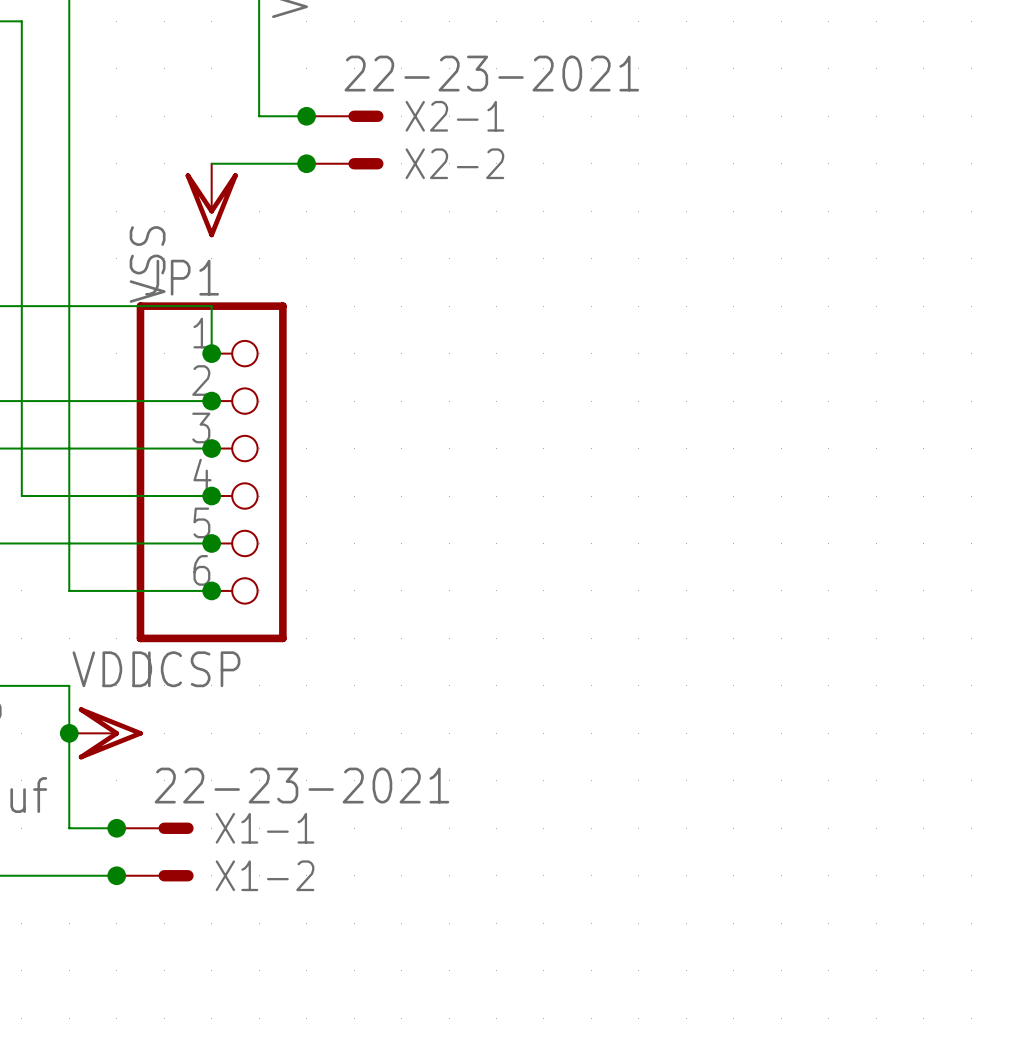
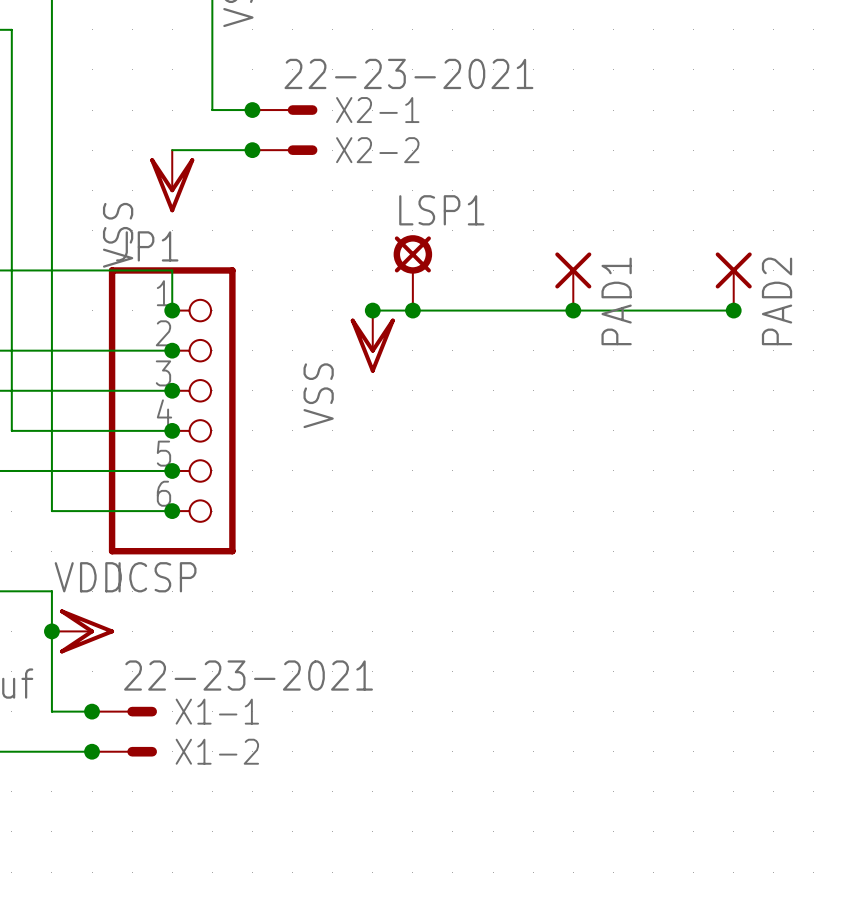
LSP1: none -> (412, 272)
PAD1: none -> (573, 281)
PAD2: none -> (733, 281)
wire: none -> (372, 310) (733, 310)
junction: none -> (372, 310)
junction: none -> (412, 310)
junction: none -> (573, 310)
junction: none -> (733, 310)
power symbol: none -> VSS (372, 341)

